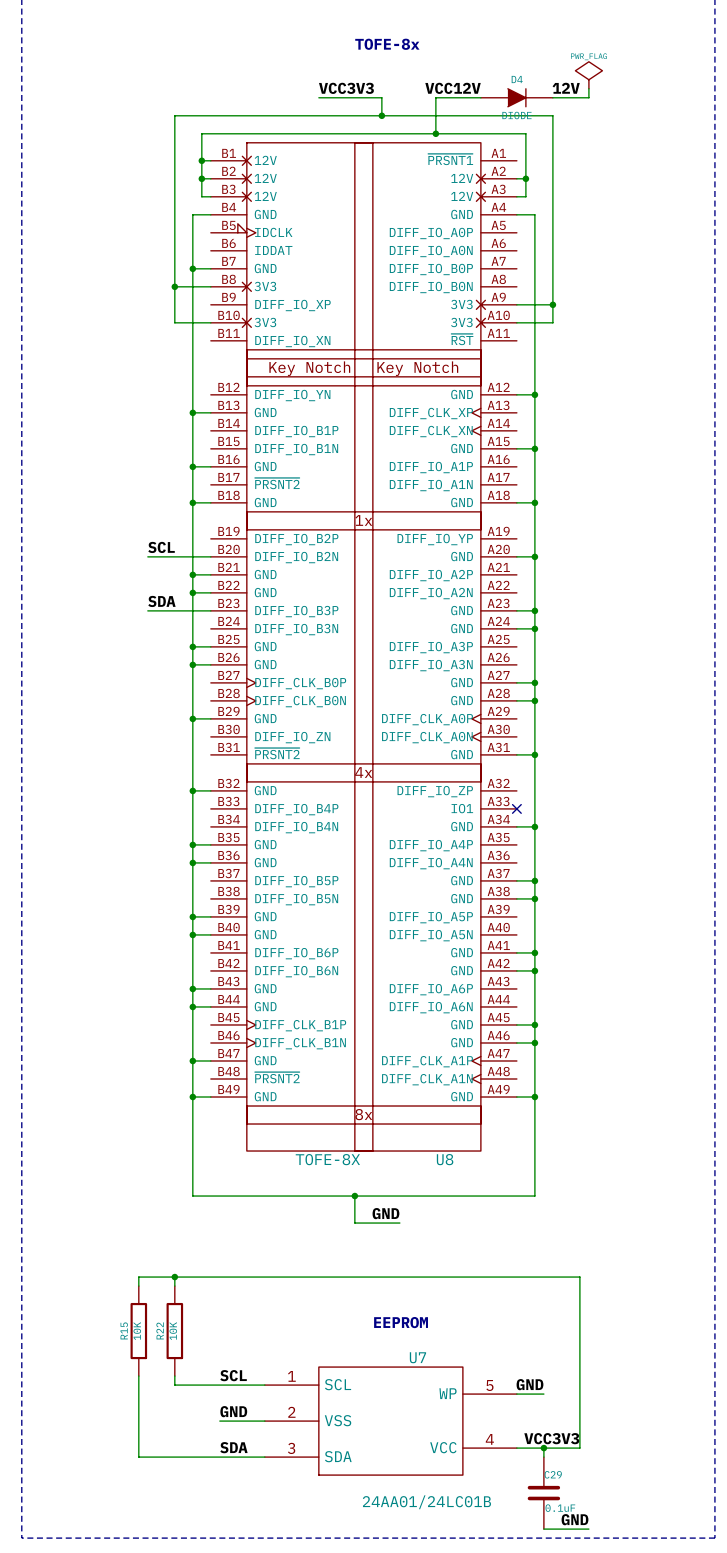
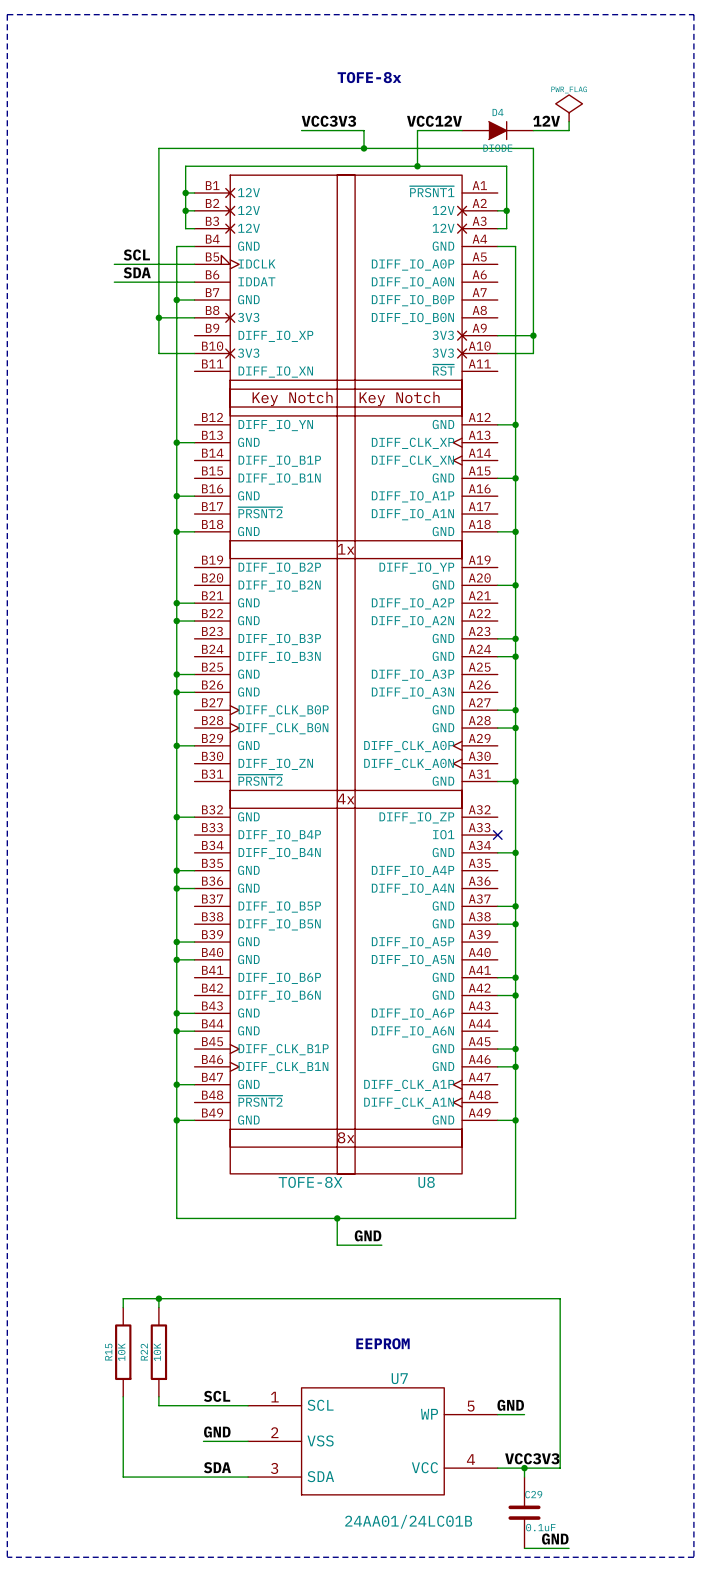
label: none -> SCL (136, 255)
wire: none -> (114, 264) (194, 264)
label: none -> SDA (137, 272)
wire: none -> (114, 282) (194, 282)
label: SCL (161, 547) -> none
wire: (147, 556) (210, 556) -> none
label: SDA (161, 601) -> none
wire: (147, 610) (210, 610) -> none

